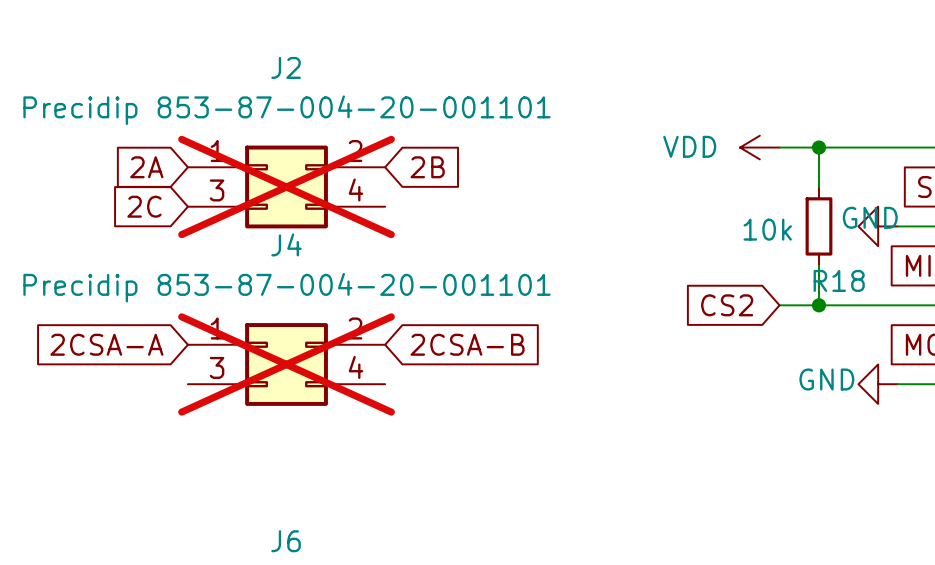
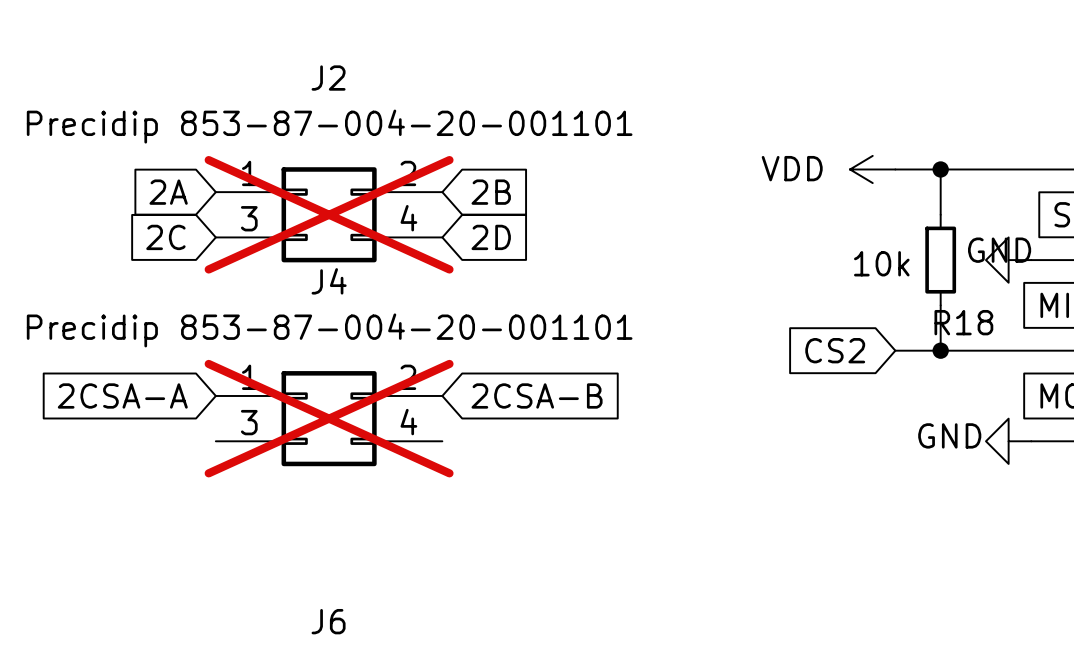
global label: none -> 2D (491, 237)

